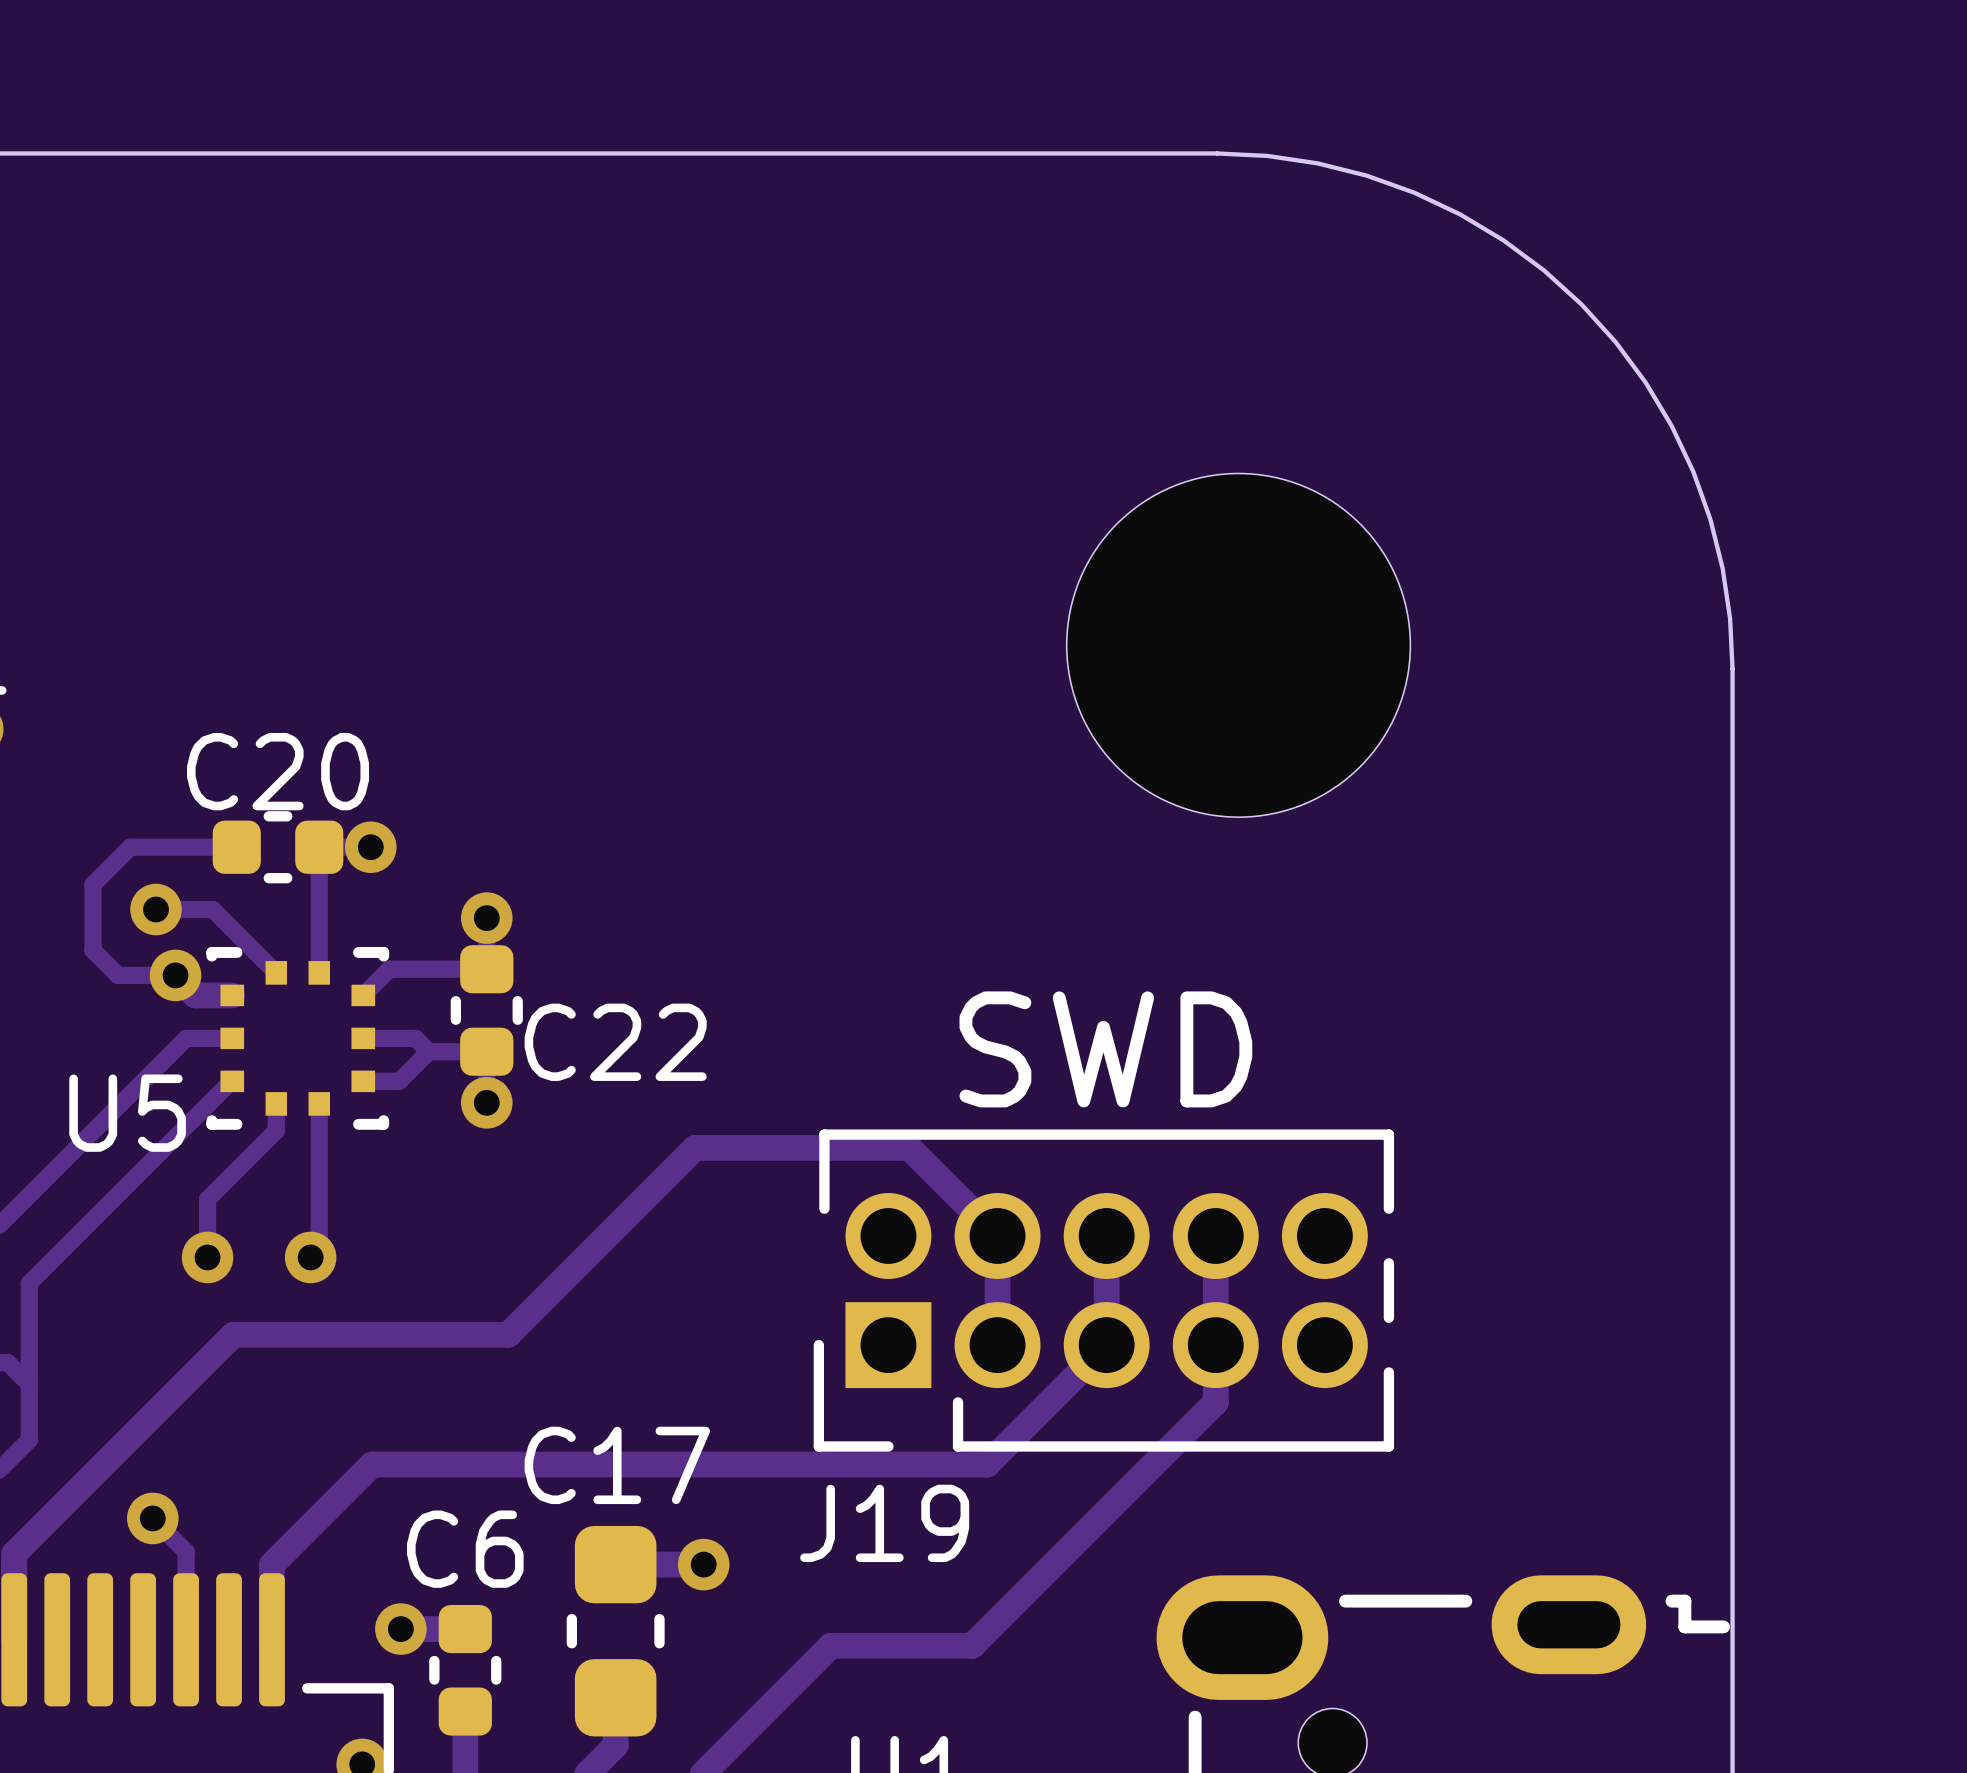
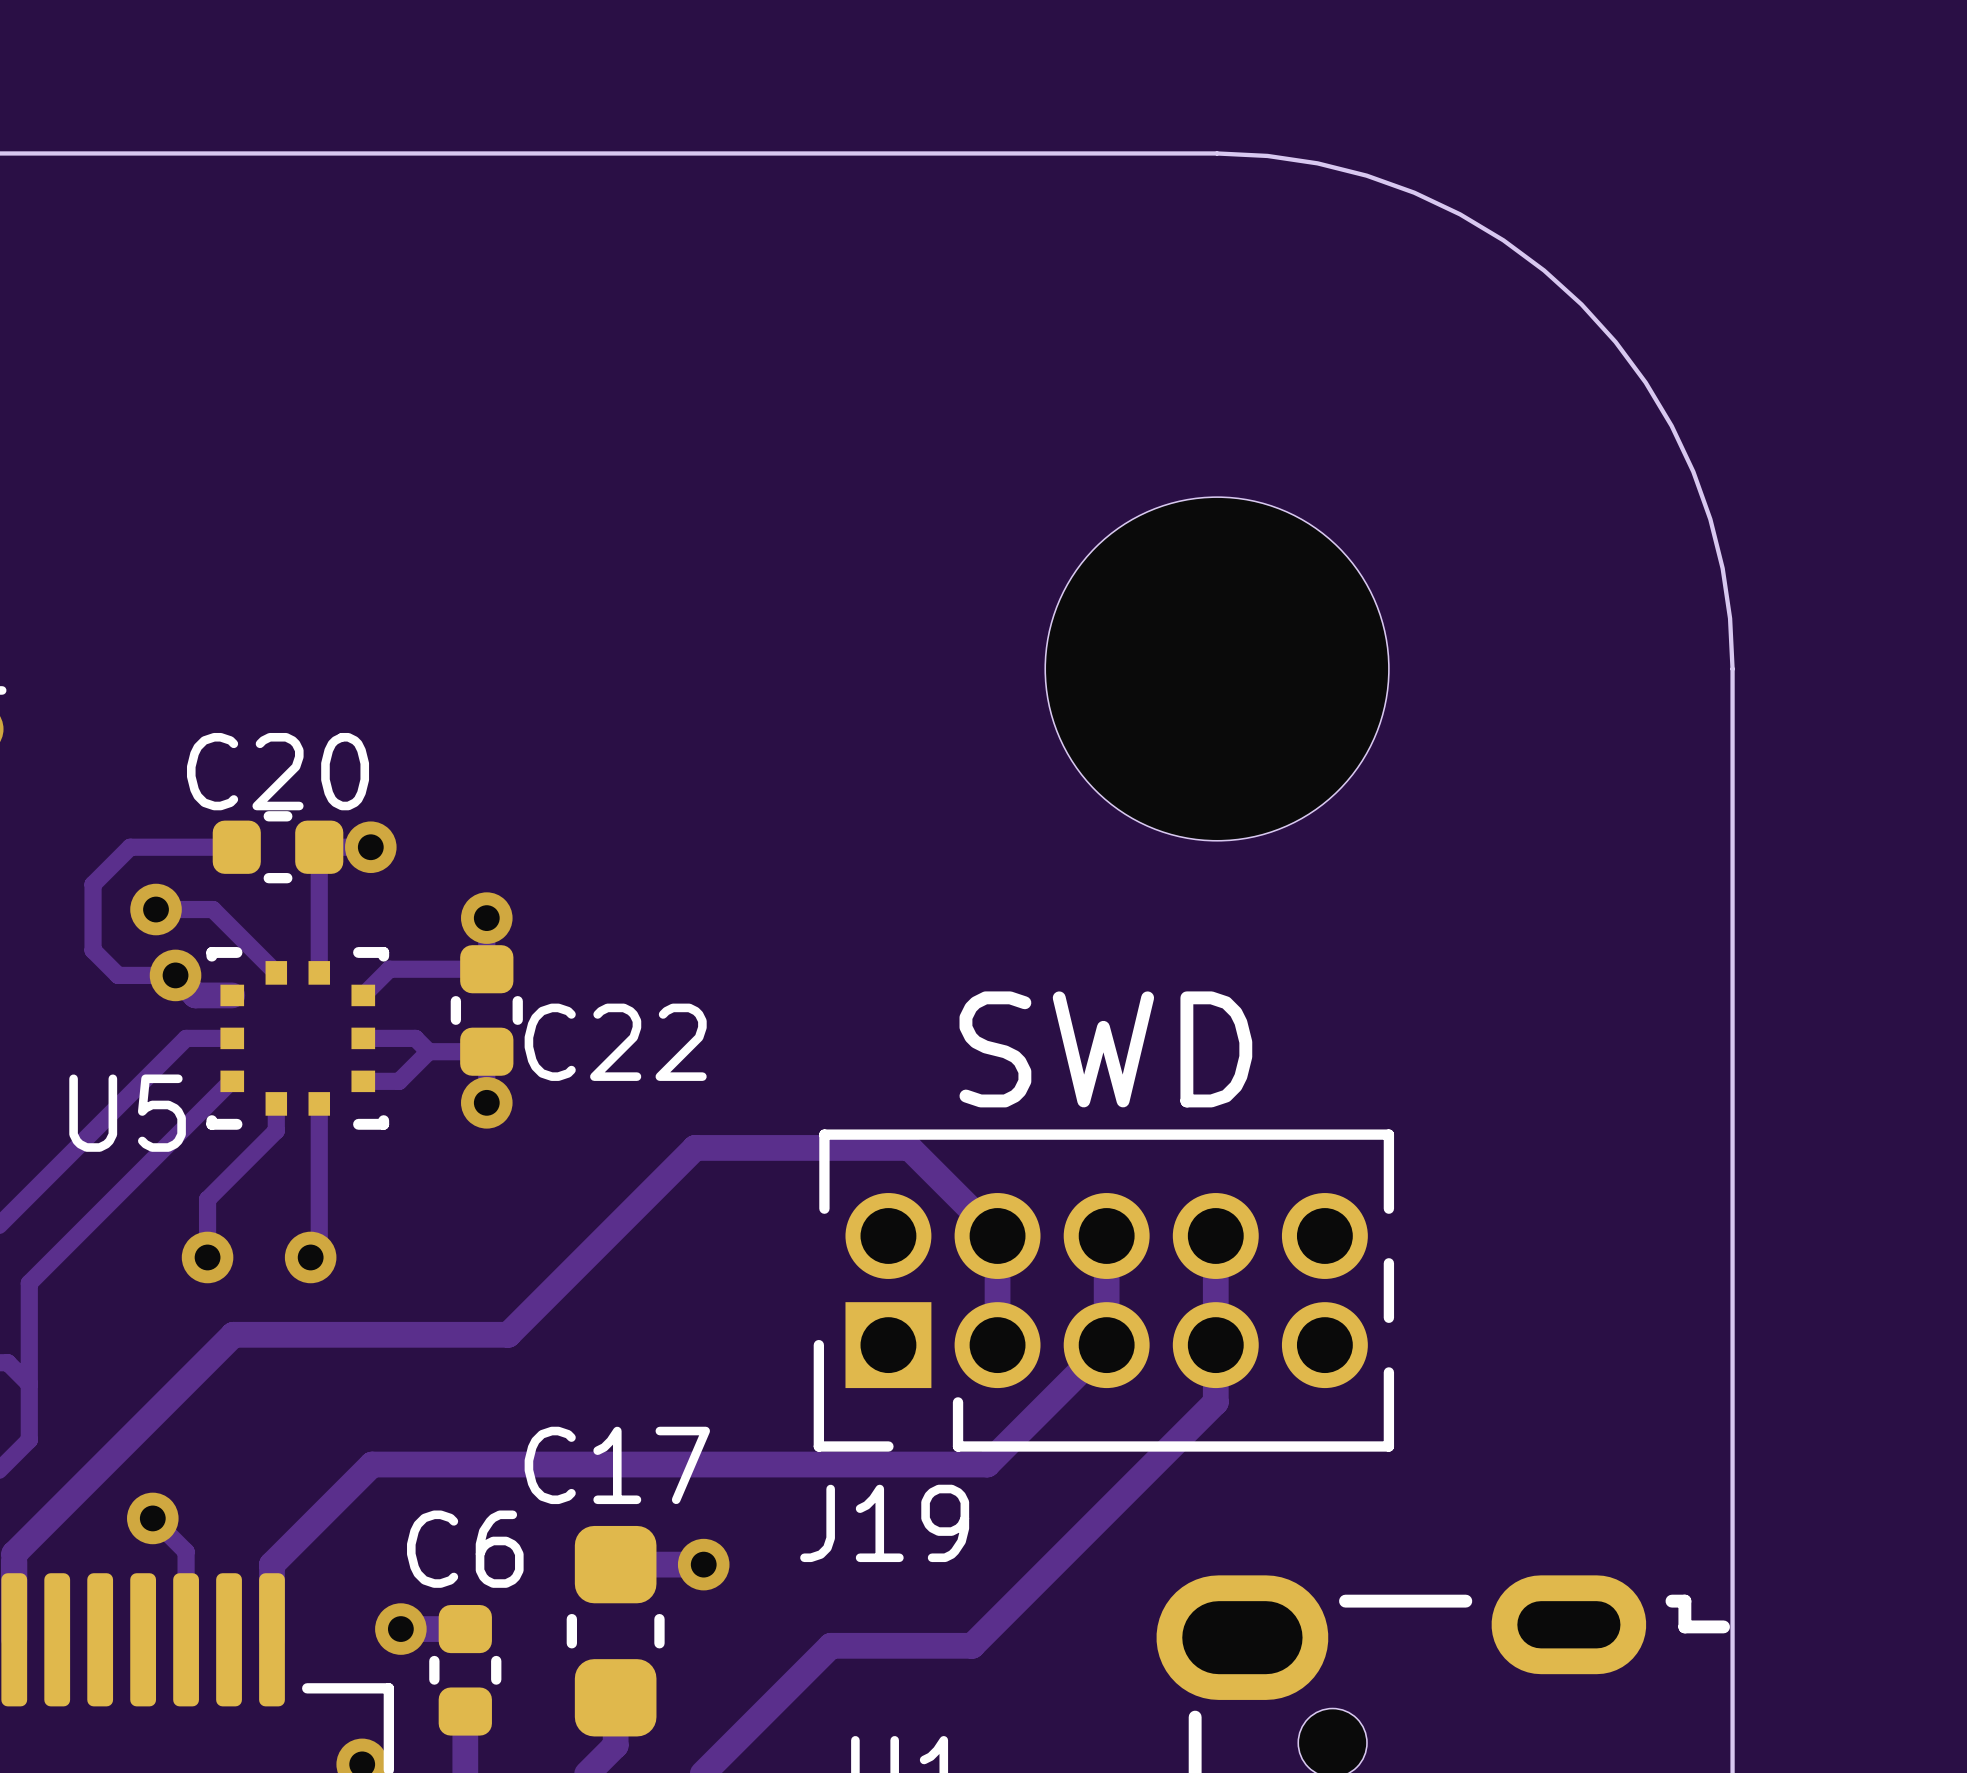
part position: (1238, 645) -> (1217, 668)

